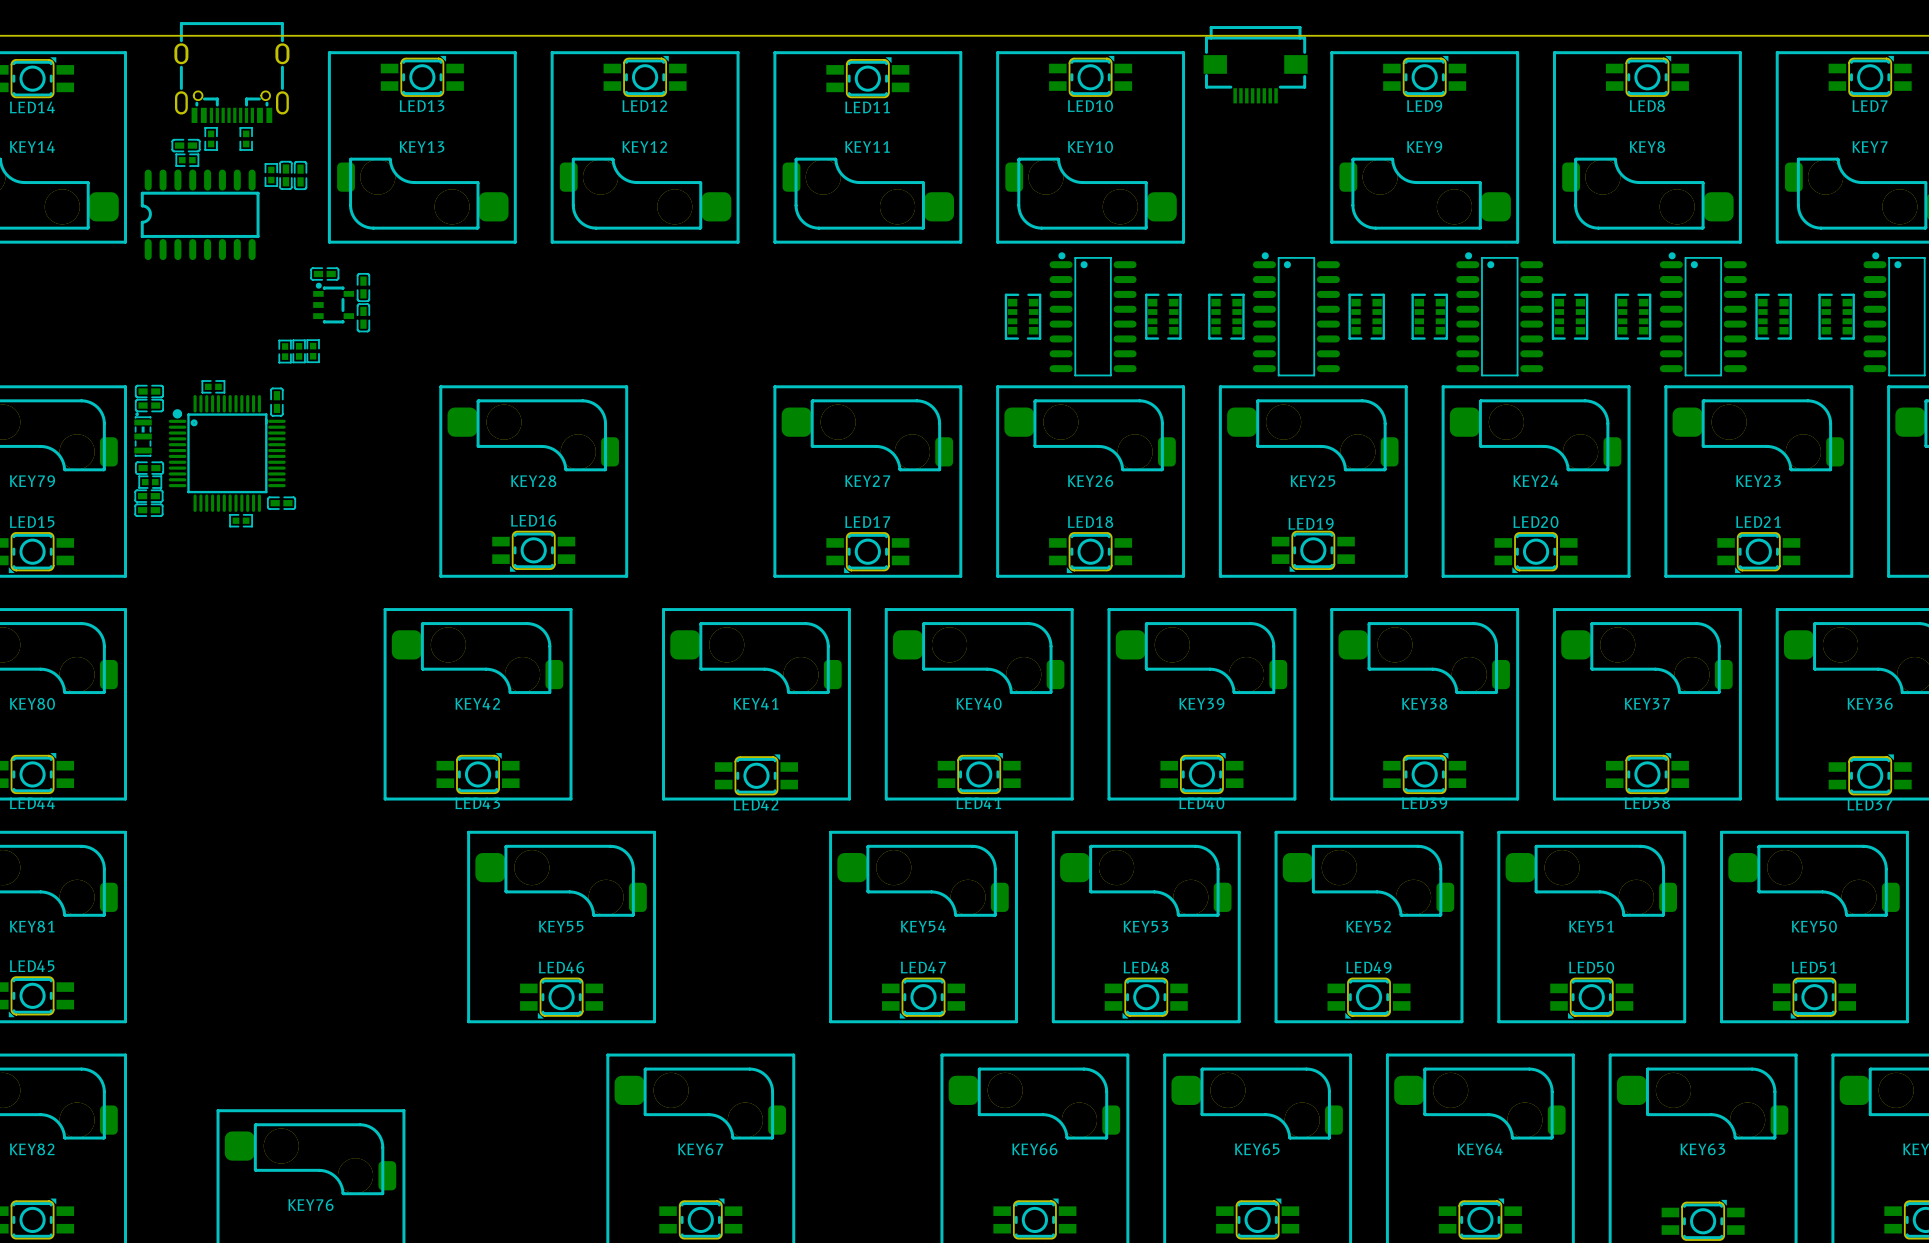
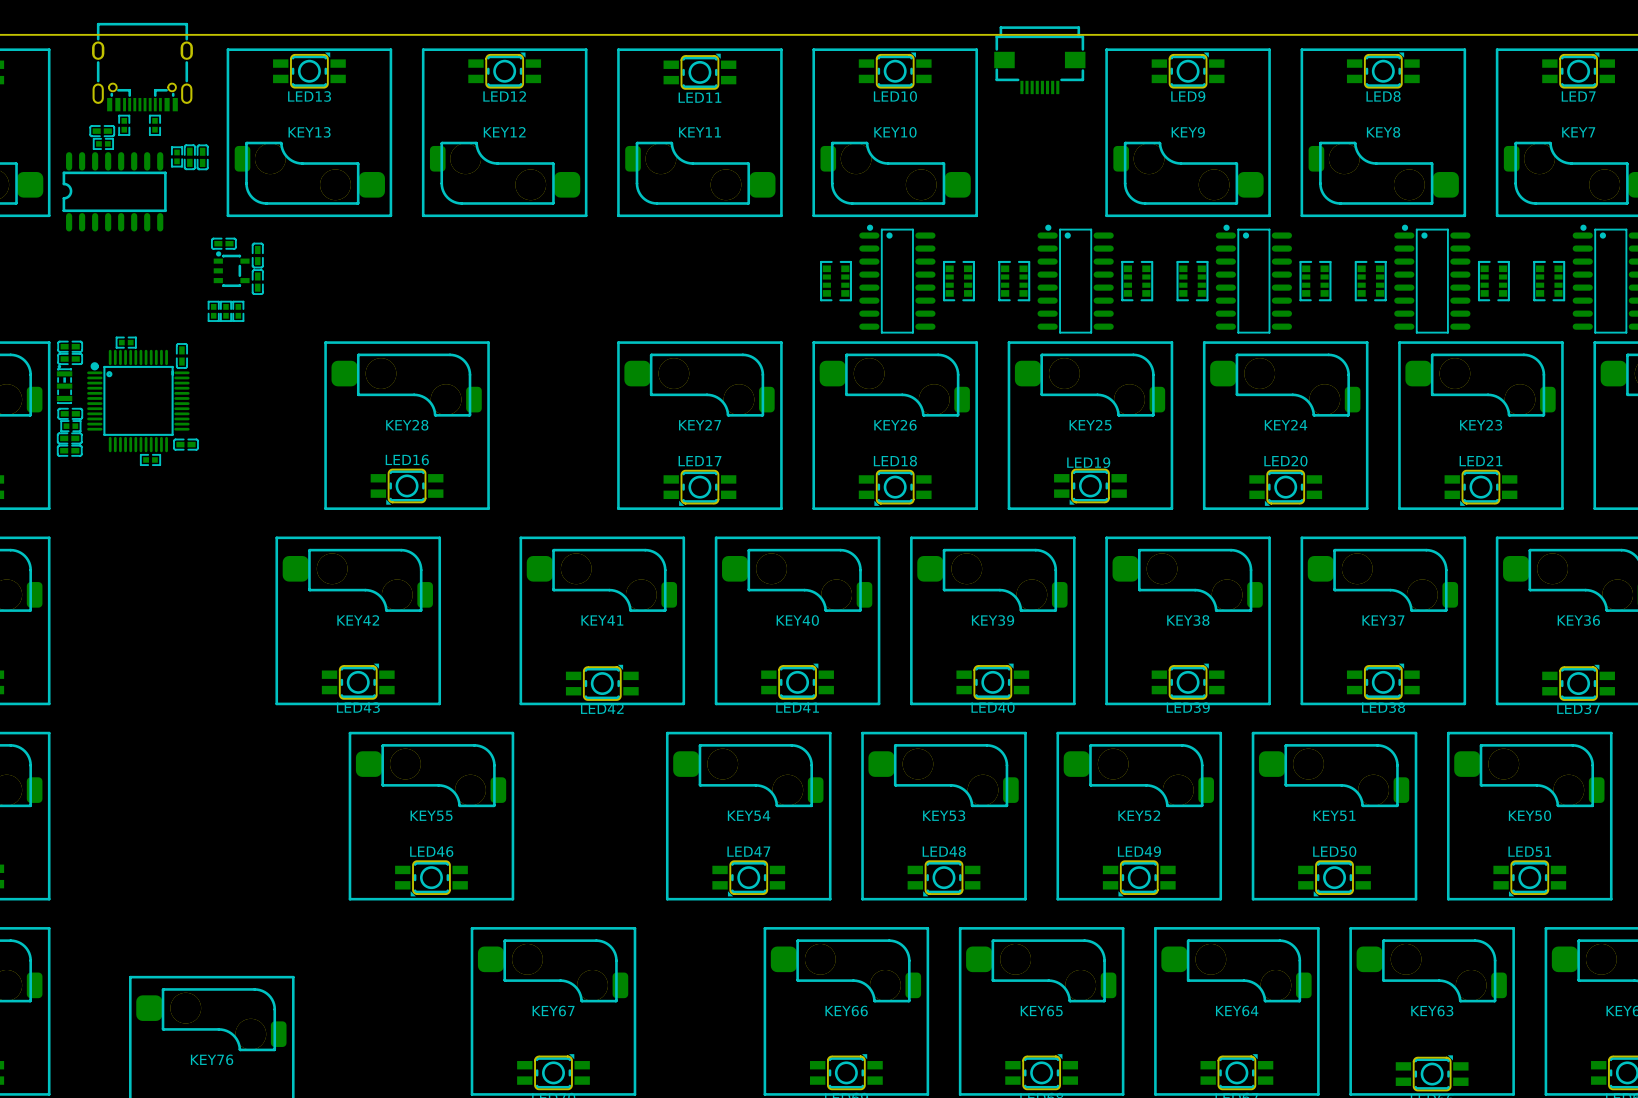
part: (285, 351) -> none
part: (299, 351) -> none
part: none -> (226, 311)
part: none -> (238, 311)

